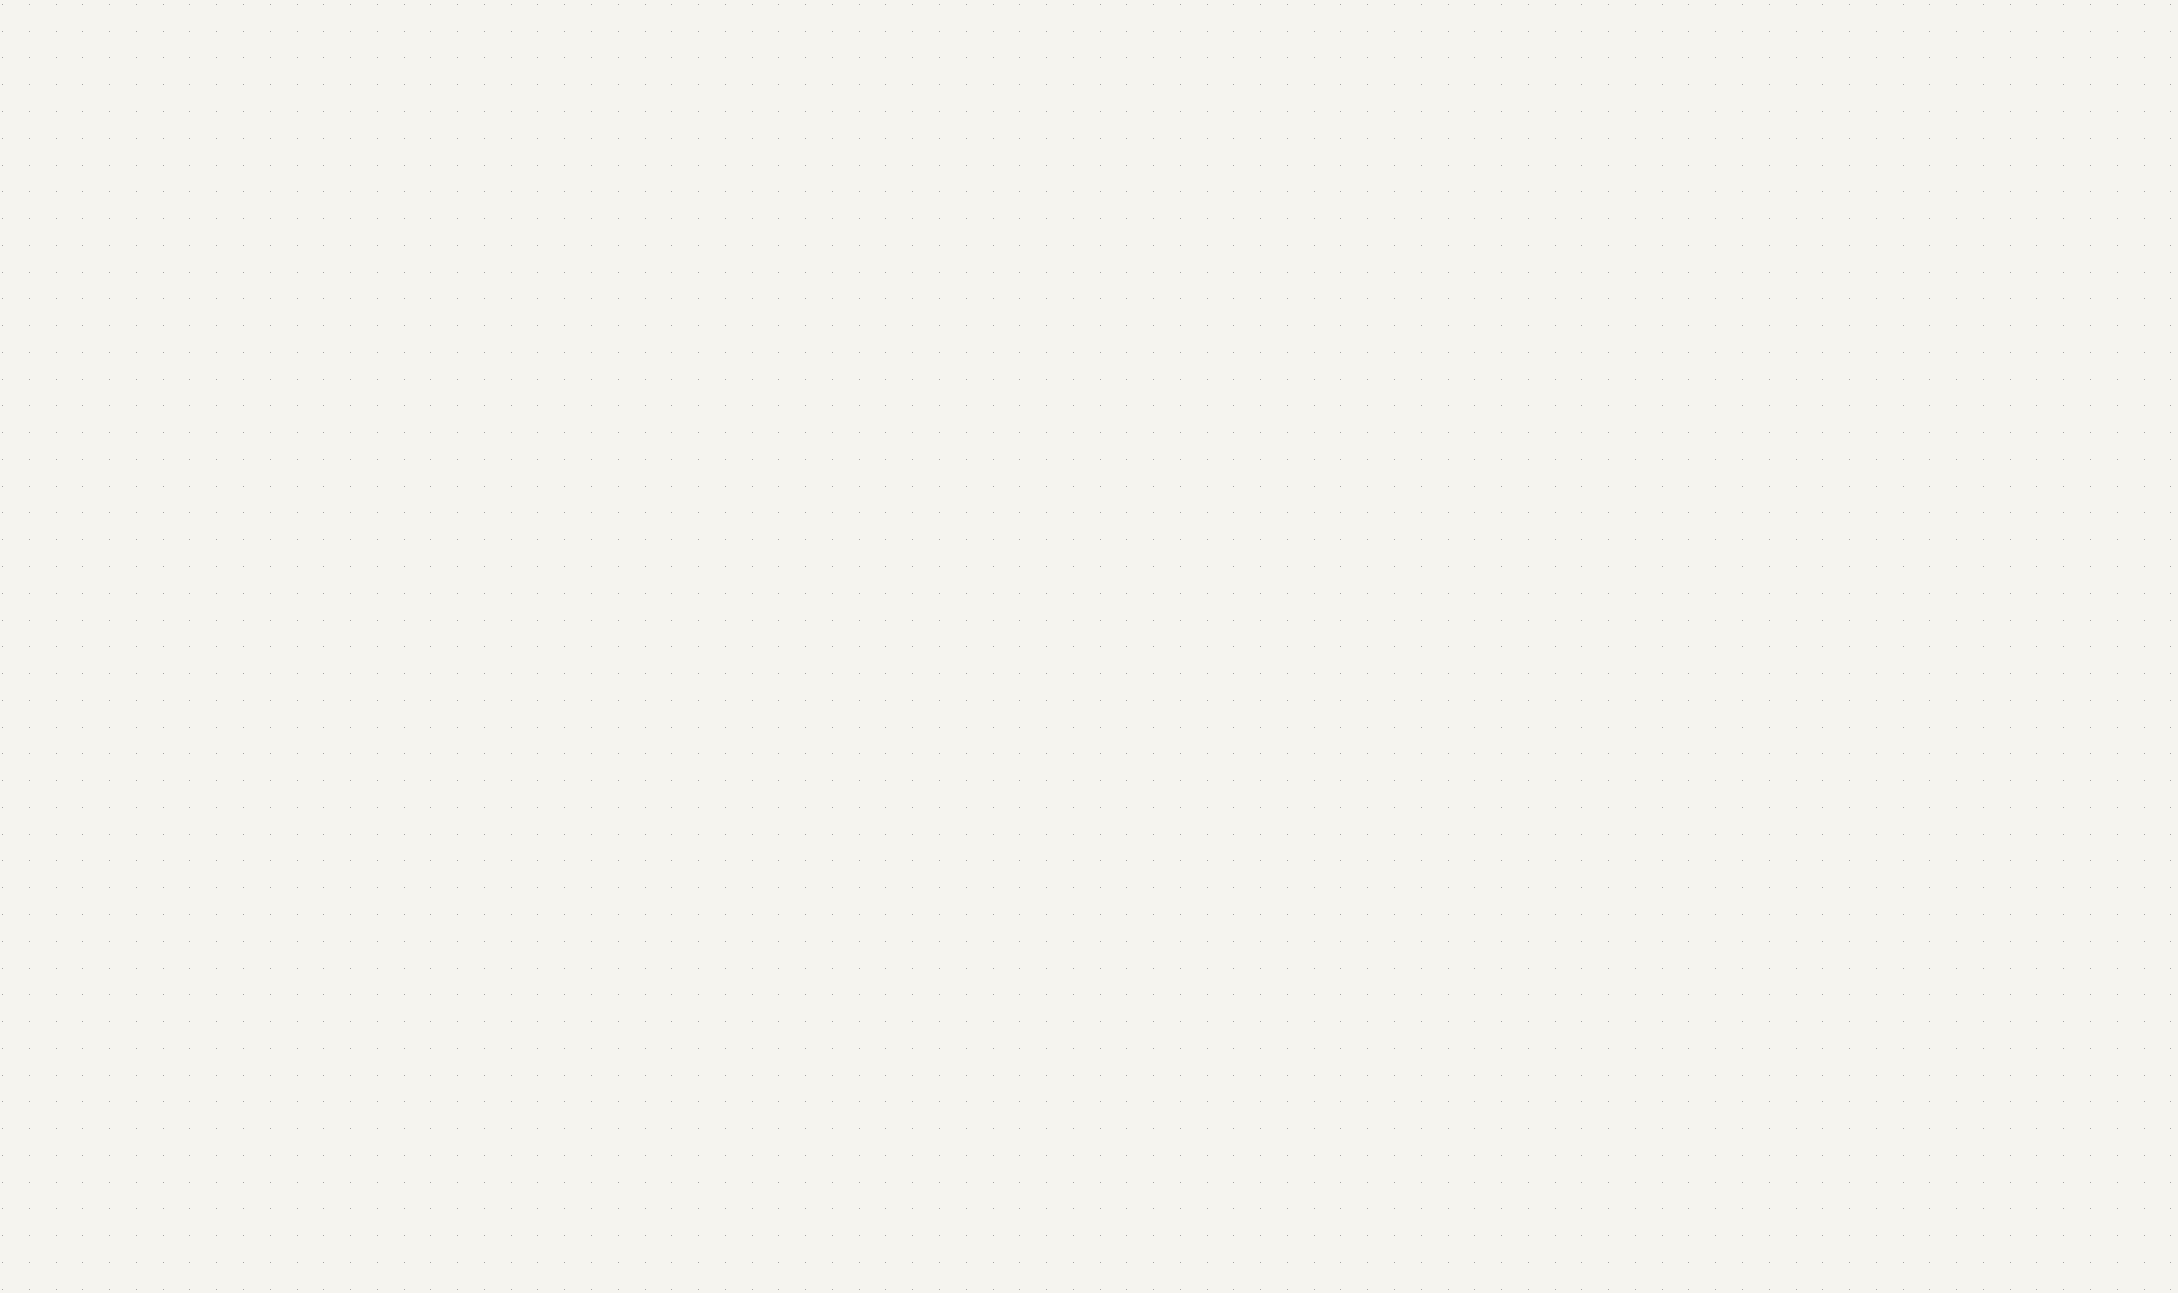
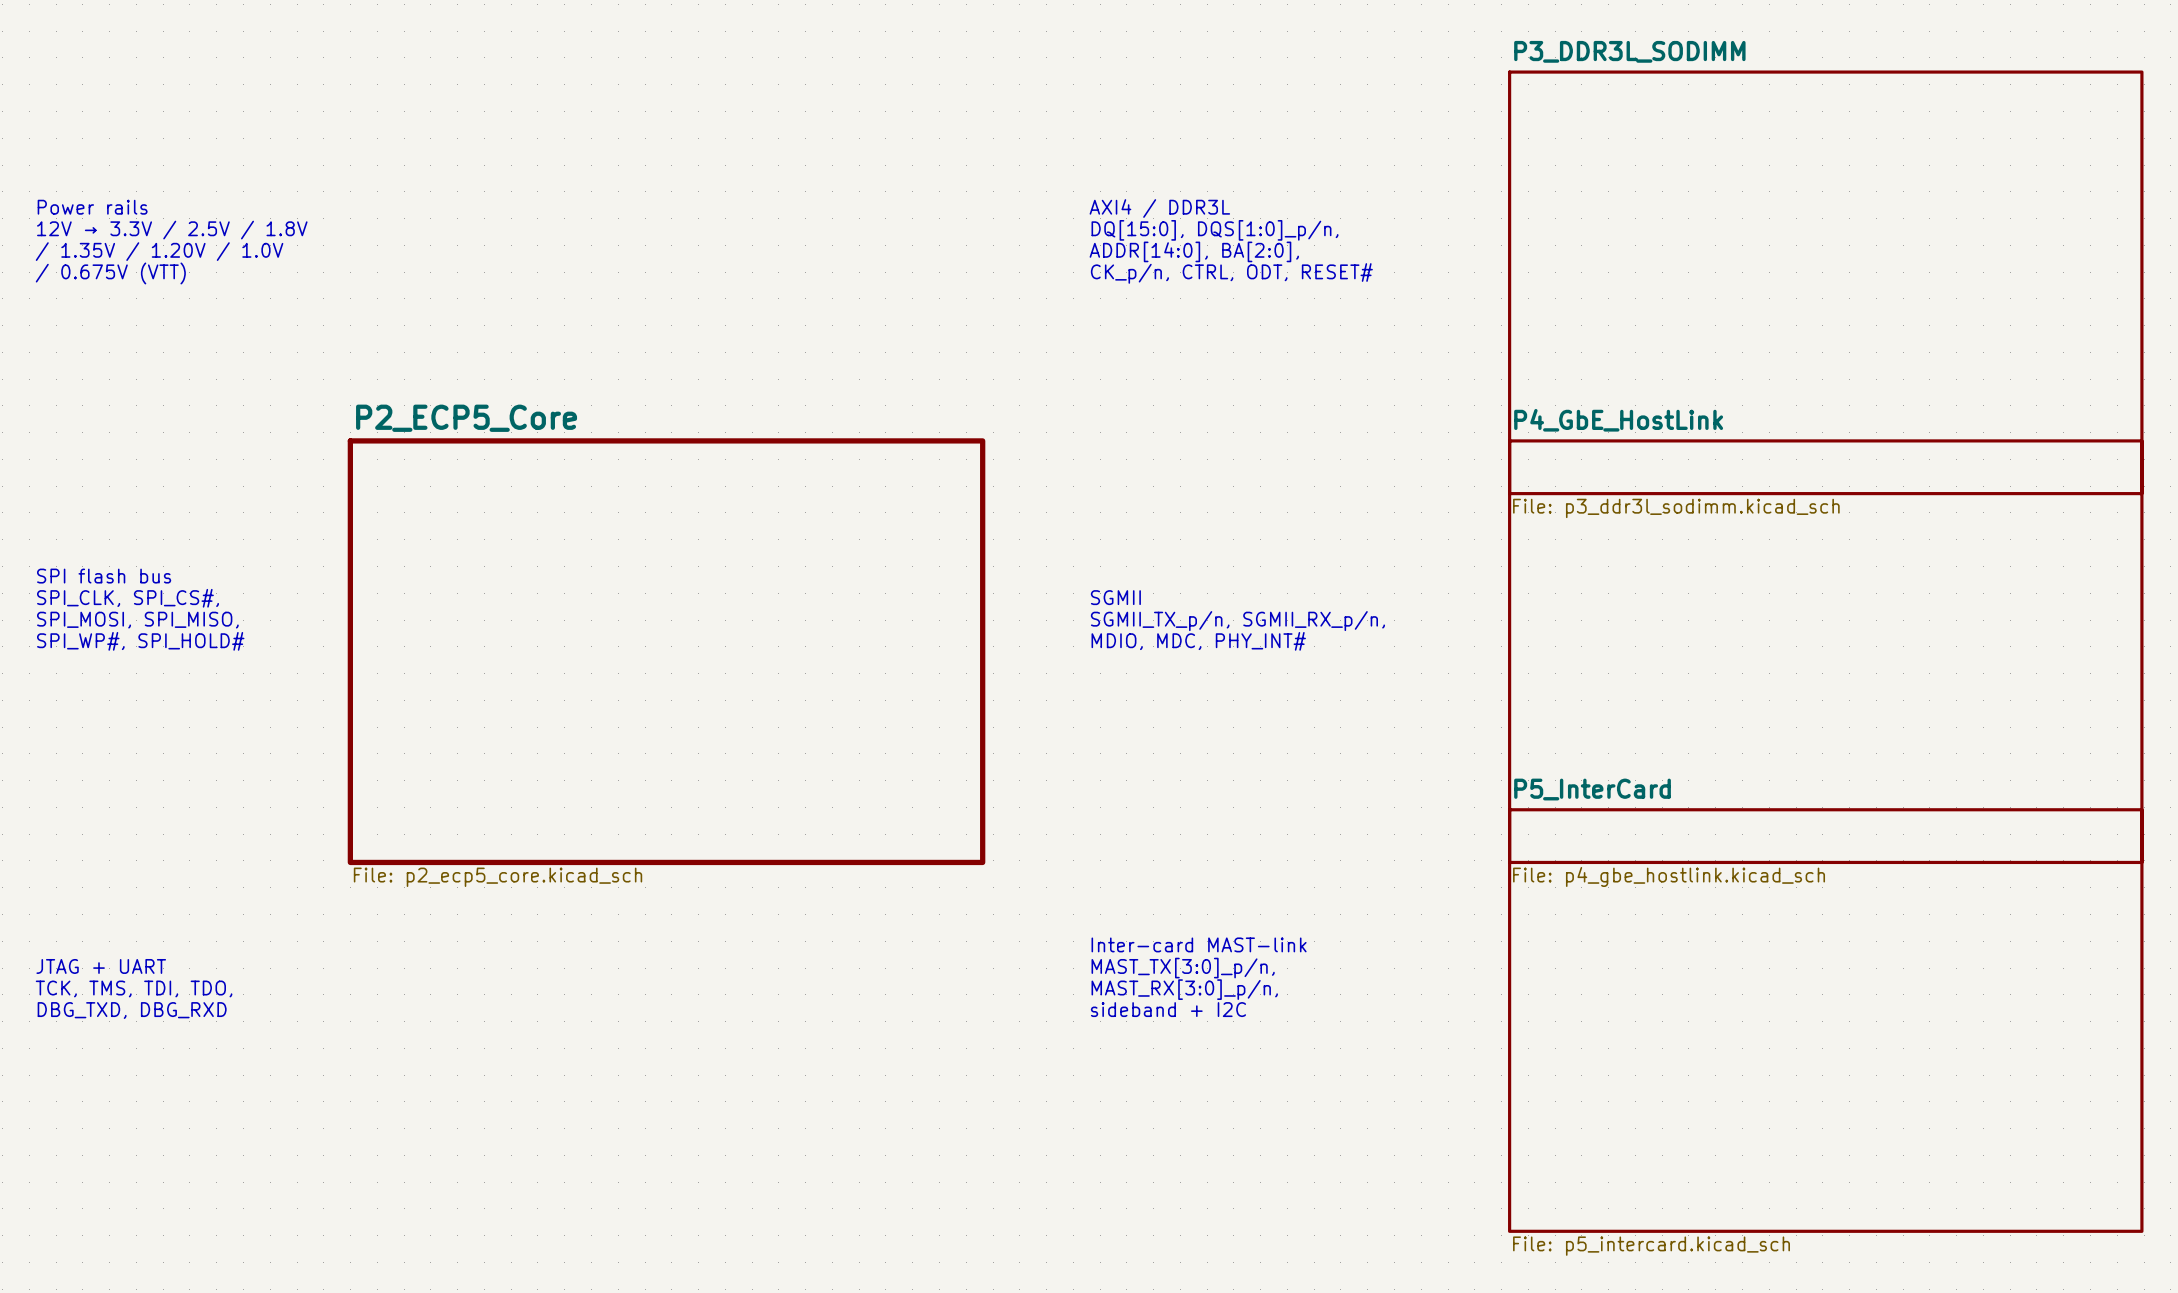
text: none -> Power rails (92, 207)
text: none -> AXI4 / DDR3L (1159, 208)
text: none -> 12V → 3.3V / 2.5V / 1.8V (172, 230)
text: none -> DQ[15:0], DQS[1:0]_p/n, (1214, 230)
text: none -> / 1.35V / 1.20V / 1.0V (159, 251)
text: none -> ADDR[14:0], BA[2:0], (1194, 251)
text: none -> / 0.675V (VTT) (110, 273)
text: none -> CK_p/n, CTRL, ODT, RESET# (1231, 273)
sheet P3_DDR3L_SODIMM: none -> File: p3_ddr3l_sodimm.kicad_sch (1825, 282)
text: none -> SPI flash bus (104, 576)
text: none -> SGMII (1115, 597)
text: none -> SPI_CLK, SPI_CS#, (127, 598)
text: none -> SPI_MOSI, SPI_MISO, (137, 620)
text: none -> SGMII_TX_p/n, SGMII_RX_p/n, (1237, 621)
text: none -> SPI_WP#, SPI_HOLD# (140, 641)
text: none -> MDIO, MDC, PHY_INT# (1198, 641)
sheet P2_ECP5_Core: none -> File: p2_ecp5_core.kicad_sch (666, 651)
sheet P4_GbE_HostLink: none -> File: p4_gbe_hostlink.kicad_sch (1825, 651)
text: none -> Inter-card MAST-link (1199, 944)
text: none -> JTAG + UART (101, 966)
text: none -> MAST_TX[3:0]_p/n, (1183, 968)
text: none -> TCK, TMS, TDI, TDO, (134, 988)
text: none -> MAST_RX[3:0]_p/n, (1184, 989)
text: none -> sideband + I2C (1168, 1009)
text: none -> DBG_TXD, DBG_RXD (132, 1010)
sheet P5_InterCard: none -> File: p5_intercard.kicad_sch (1825, 1020)

